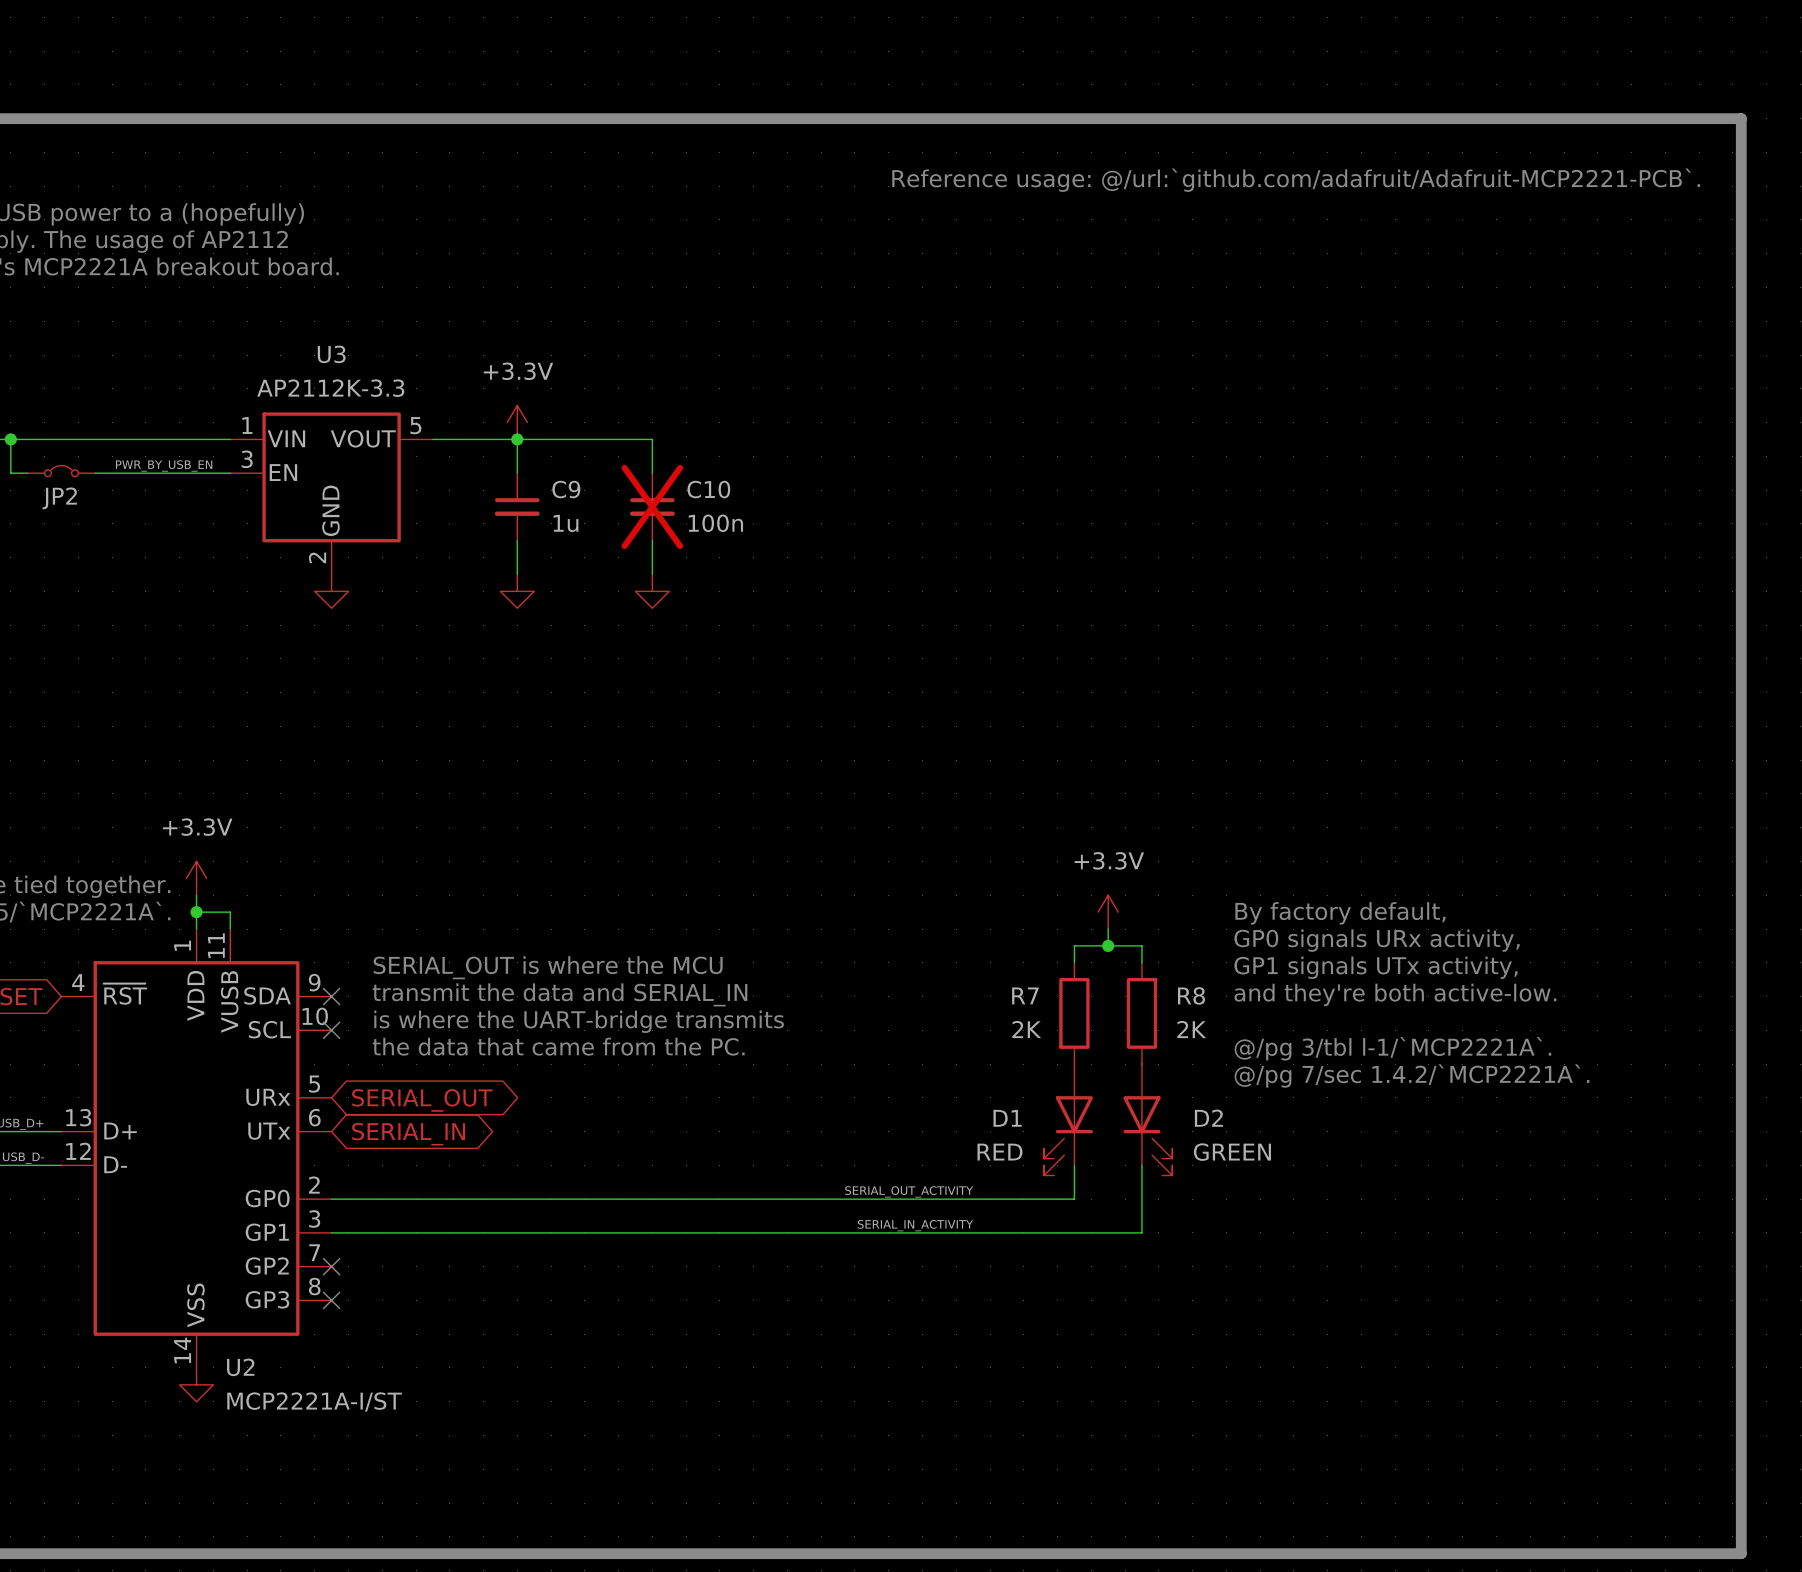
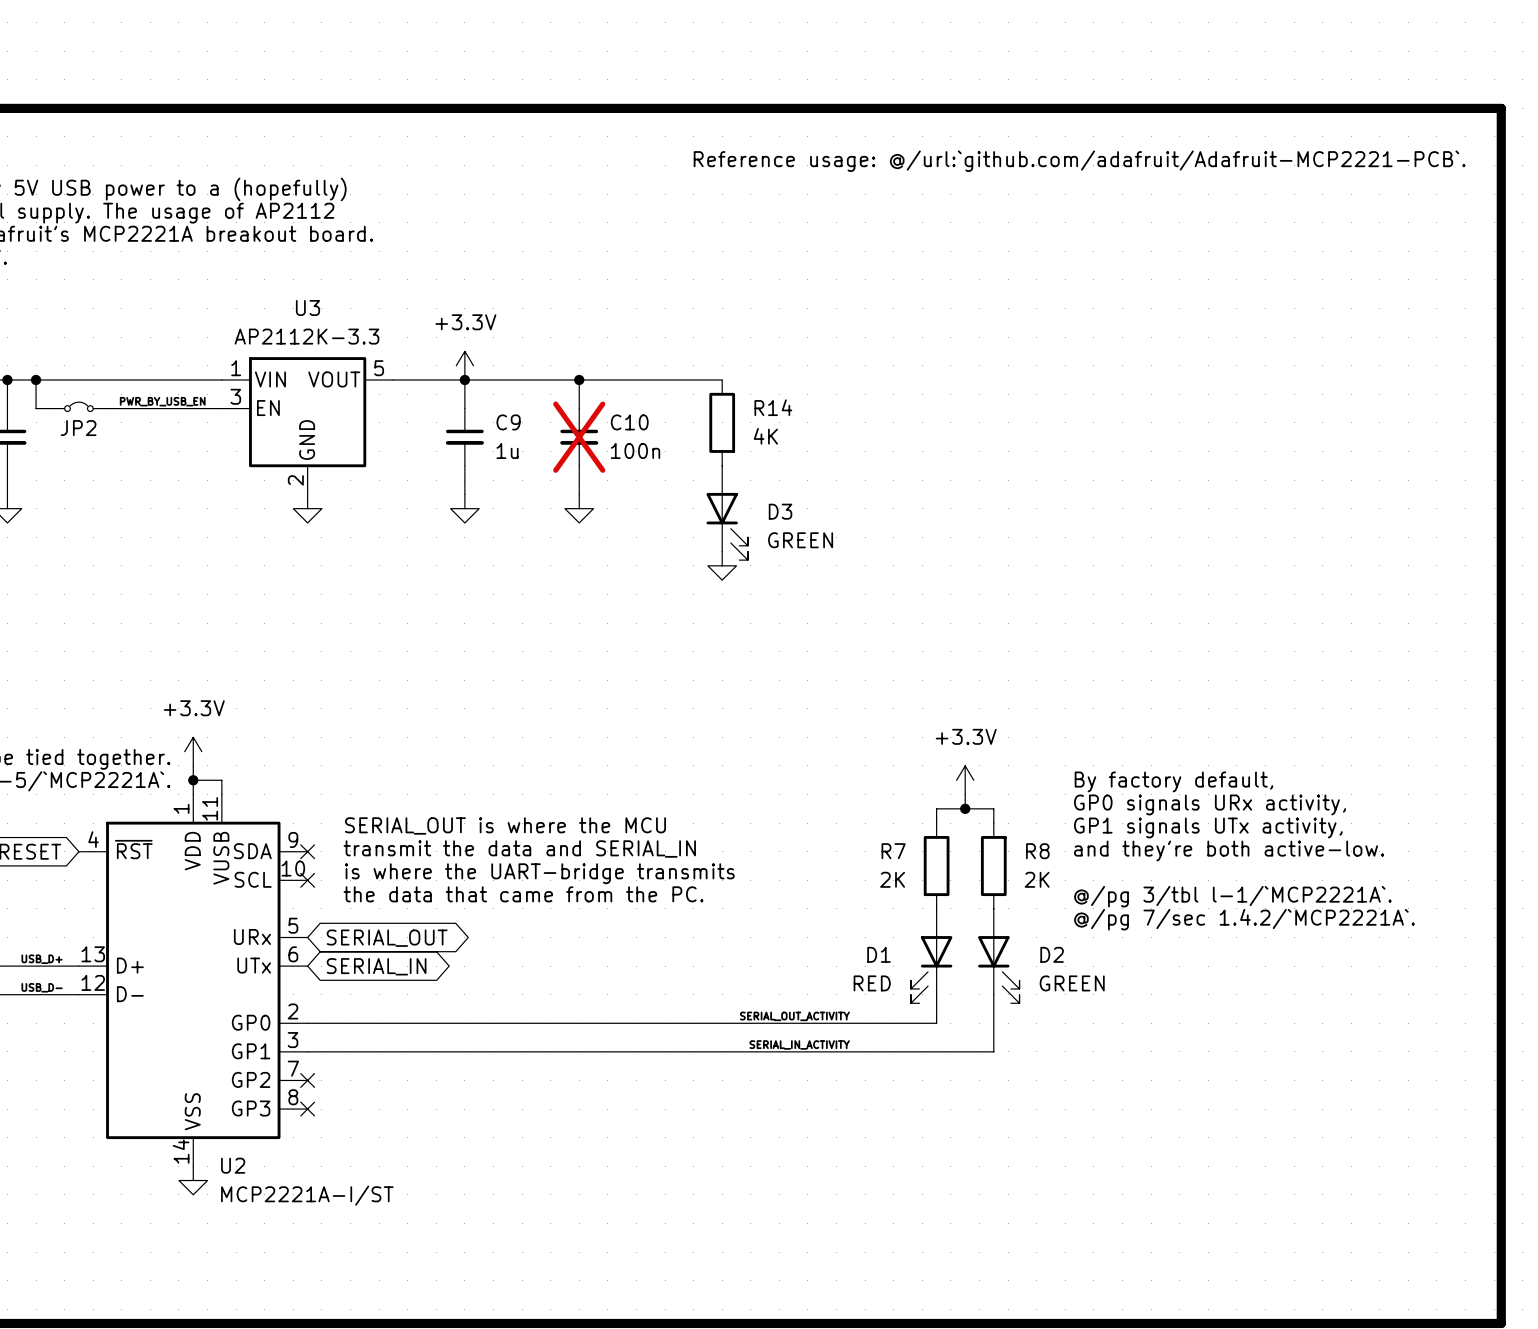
wire: none -> (579, 380) (722, 380)
junction: none -> (579, 380)
R14: none -> 4K (722, 422)
D3: none -> GREEN (727, 512)
power symbol: none -> (722, 565)

